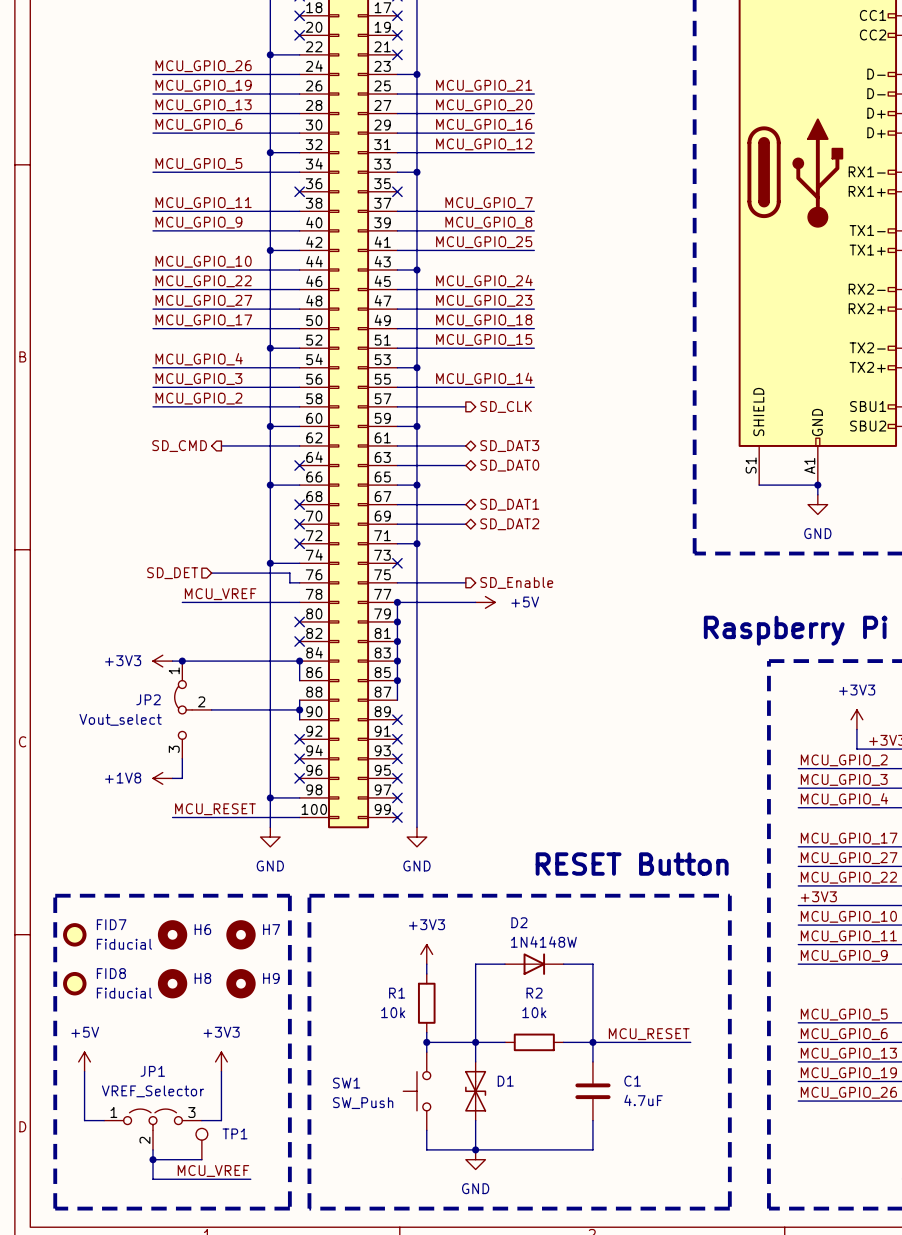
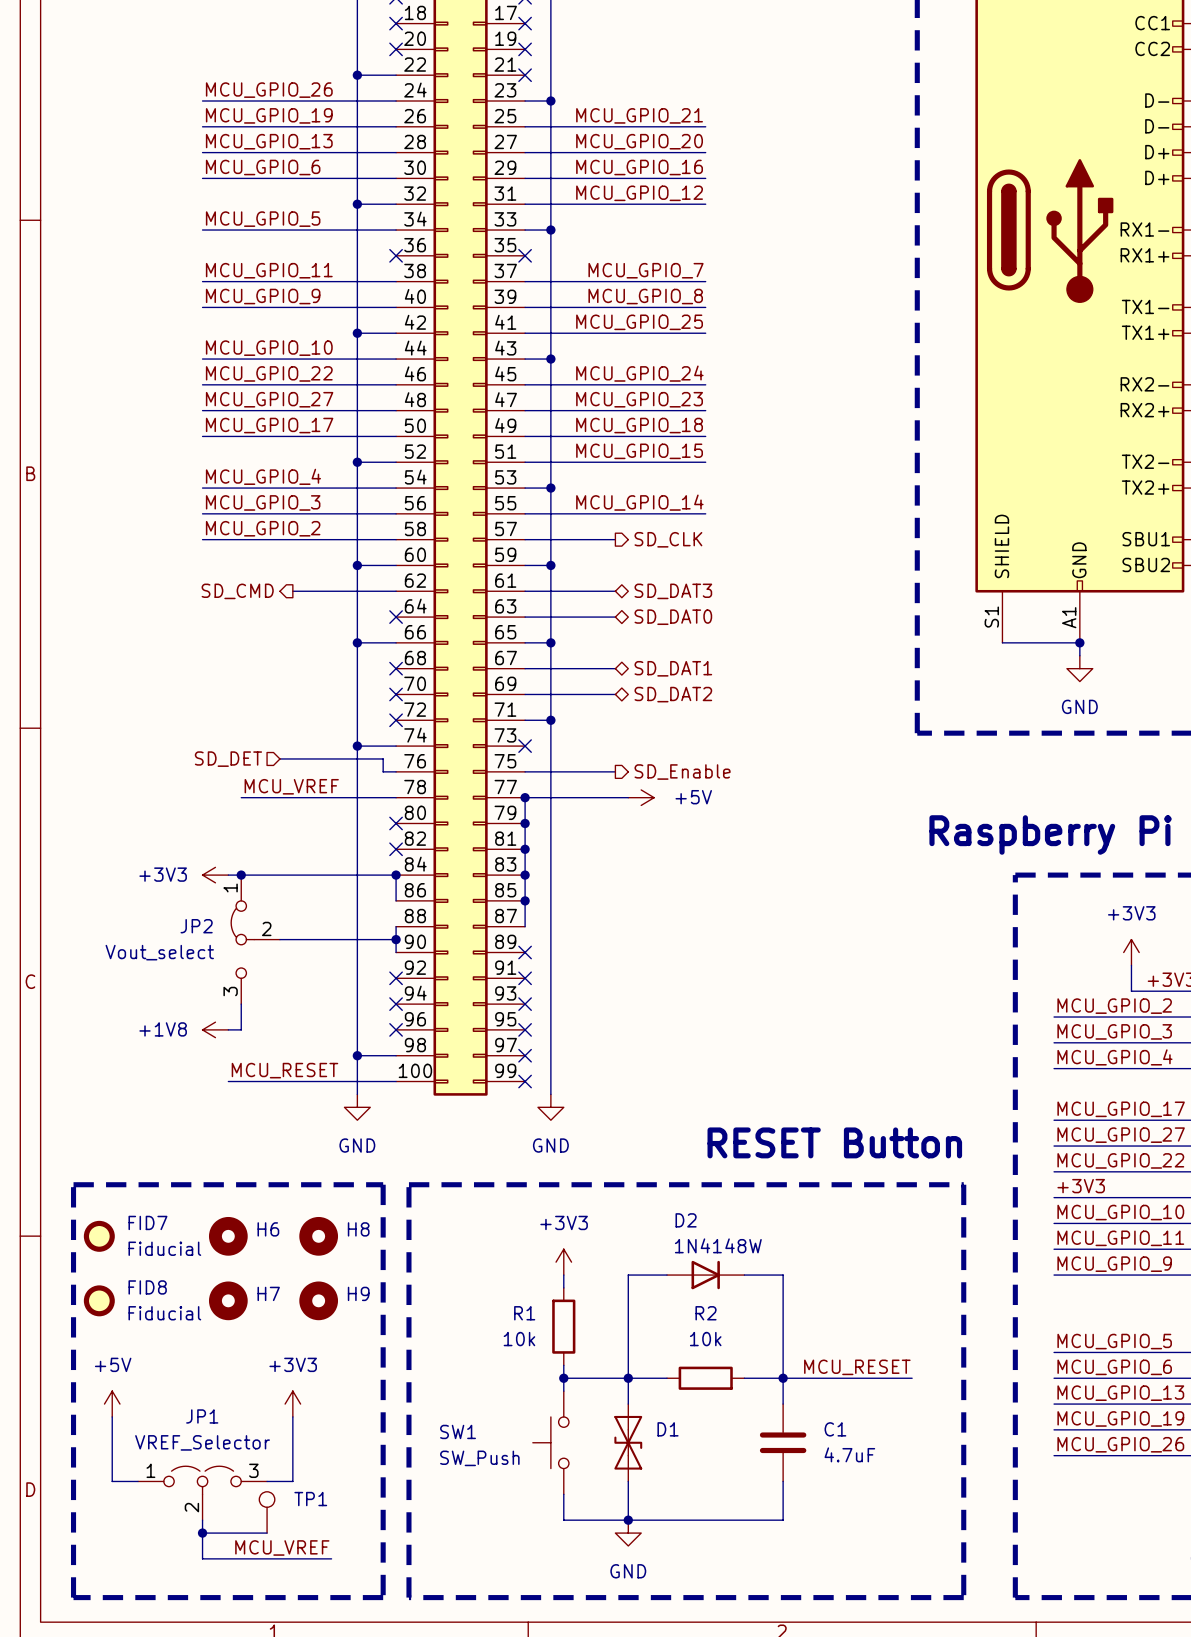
H7 name: H7 (271, 929) -> H8 (358, 1229)
H8 name: H8 (202, 978) -> H7 (268, 1293)

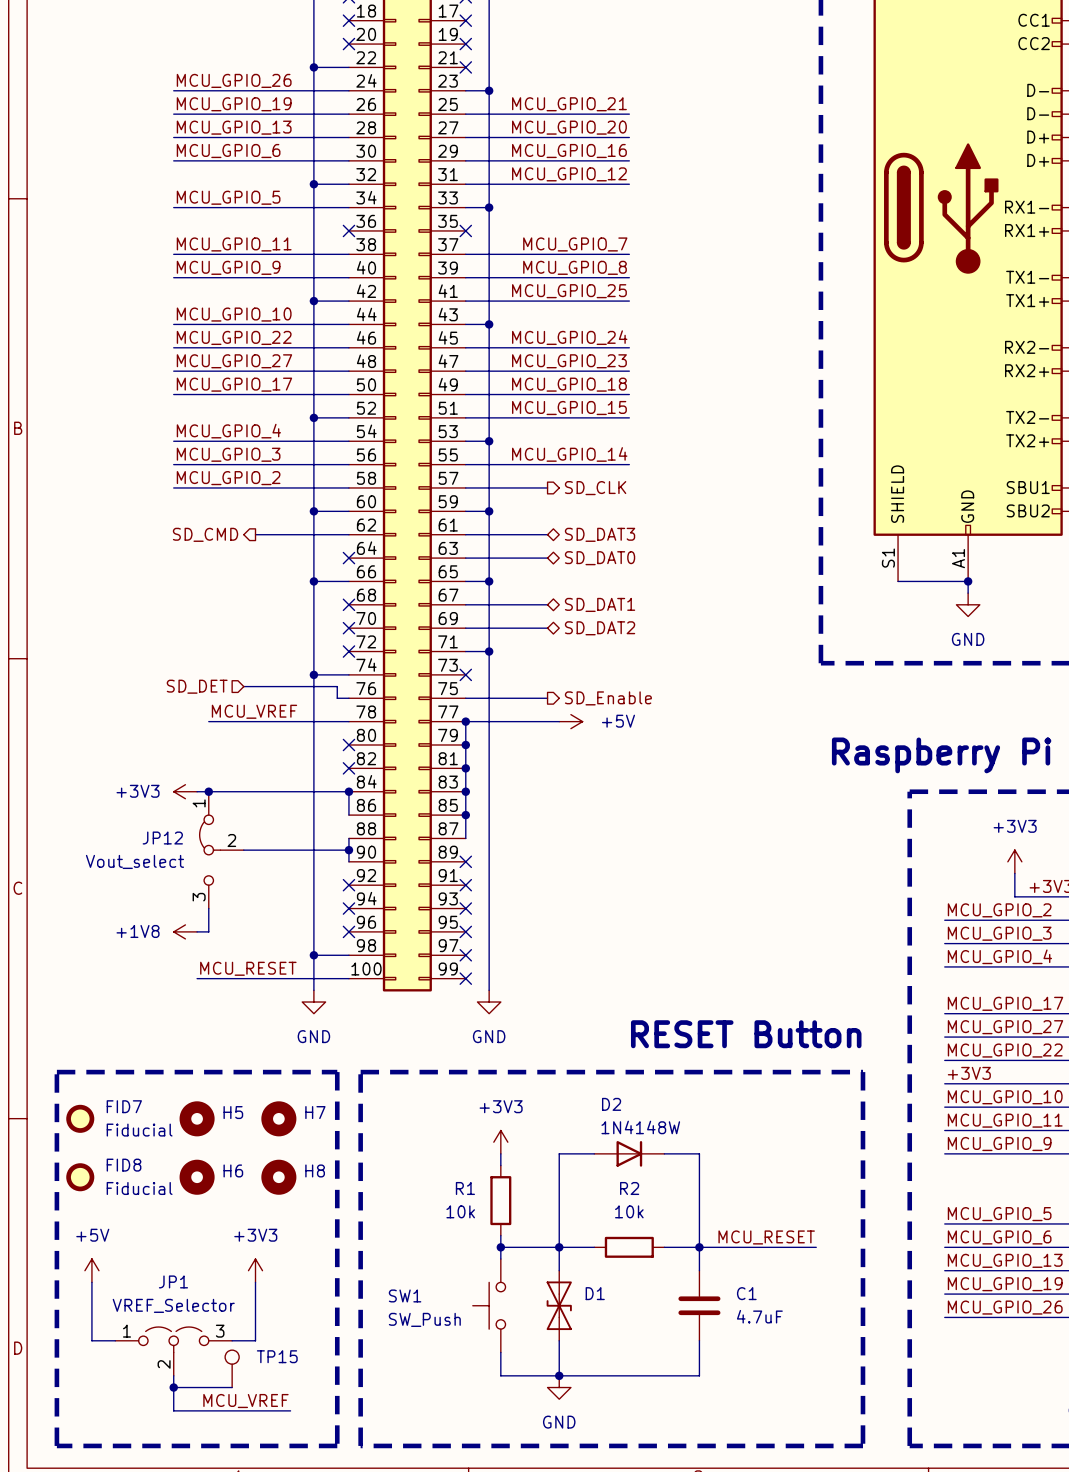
JP2 name: JP2 (196, 926) -> JP12 (162, 838)
H6 name: H6 (268, 1229) -> H5 (233, 1112)
H8 name: H8 (358, 1229) -> H7 (315, 1112)
H7 name: H7 (268, 1293) -> H6 (233, 1170)
H9 name: H9 (358, 1293) -> H8 (315, 1170)
TP1 name: TP1 (310, 1499) -> TP15 (277, 1356)

